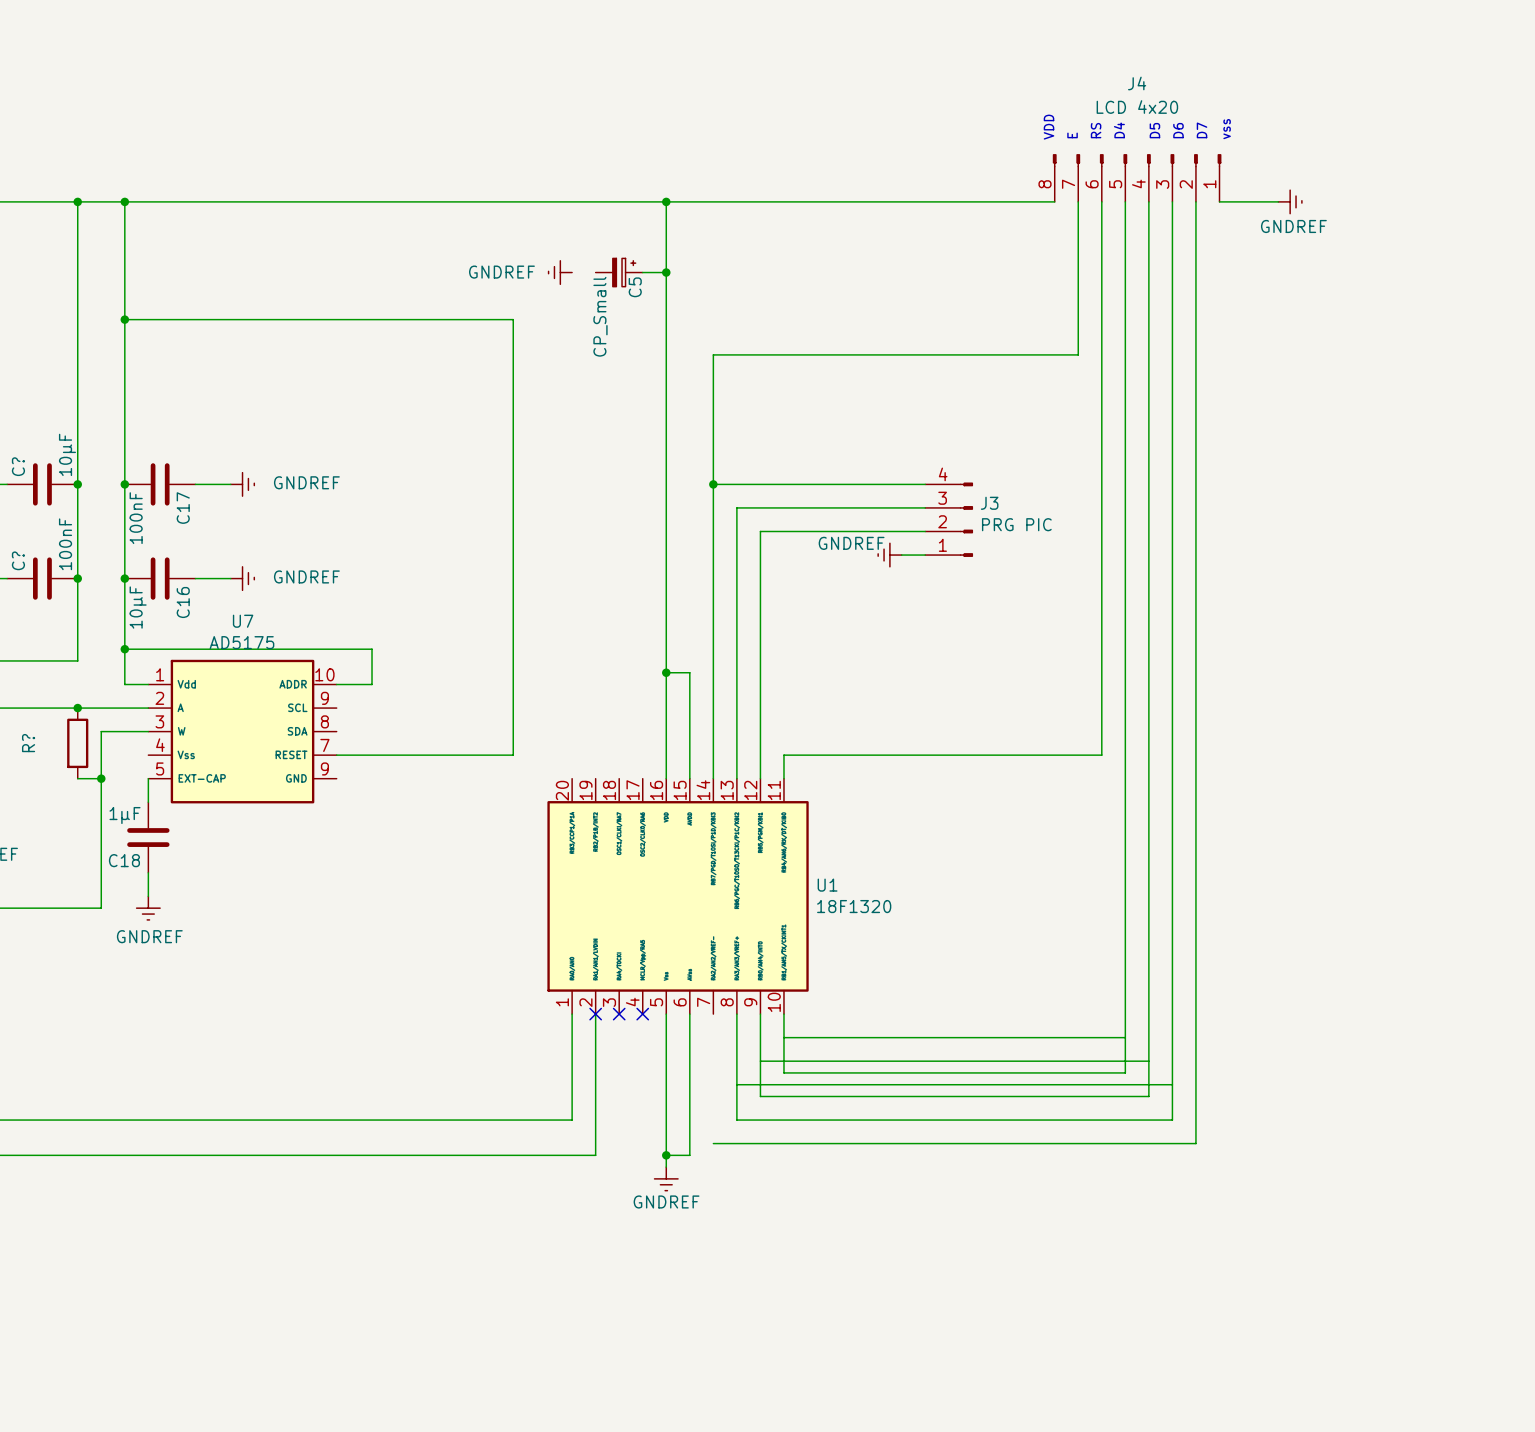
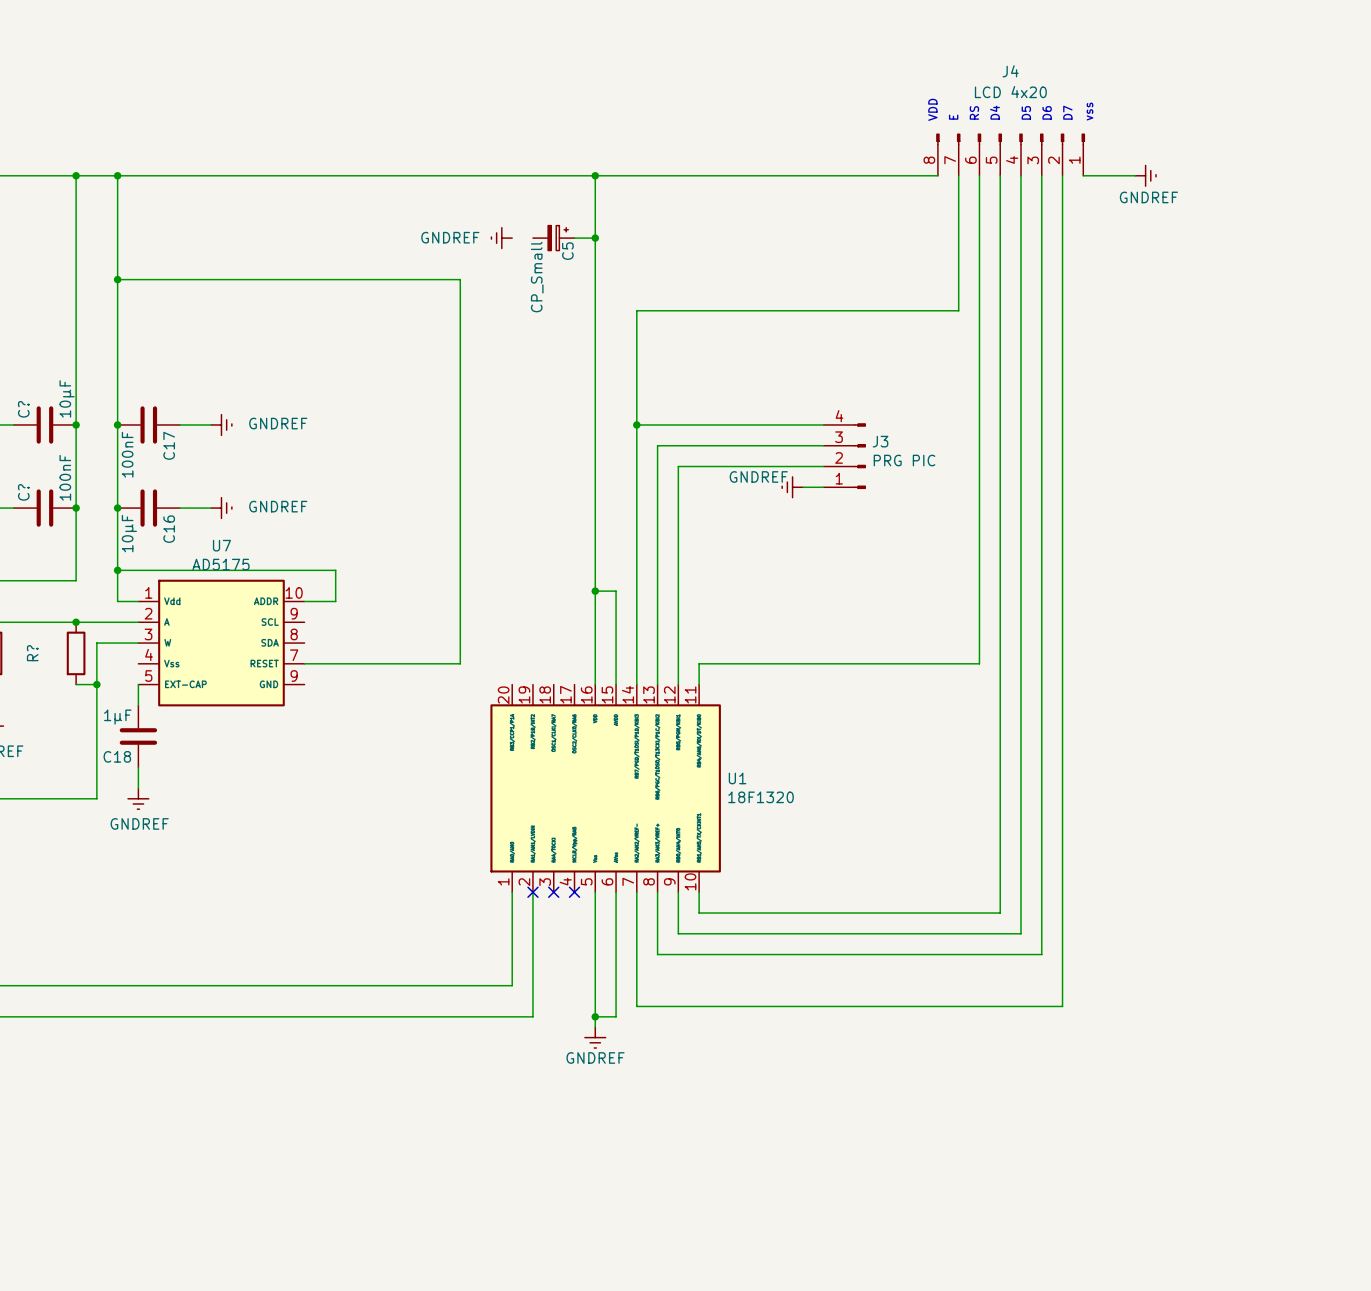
wire: none -> (636, 892) (636, 1006)
wire: (783, 1037) (783, 1072) (1125, 1072) (1125, 1037) -> none
wire: (760, 1061) (760, 1096) (1148, 1096) (1148, 1061) -> none
wire: (736, 1084) (736, 1120) (1172, 1120) (1172, 1084) -> none

